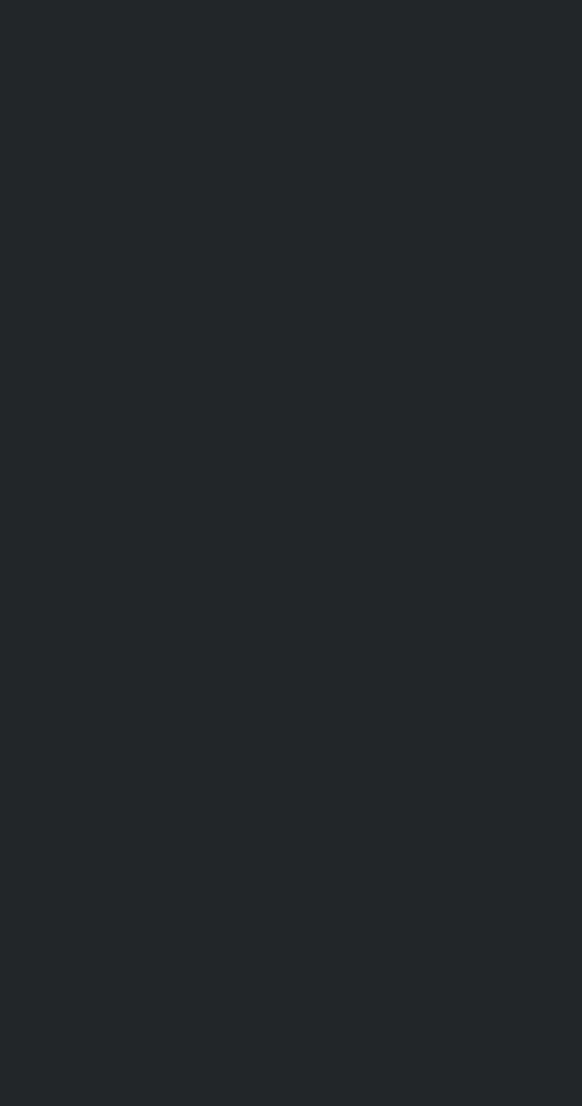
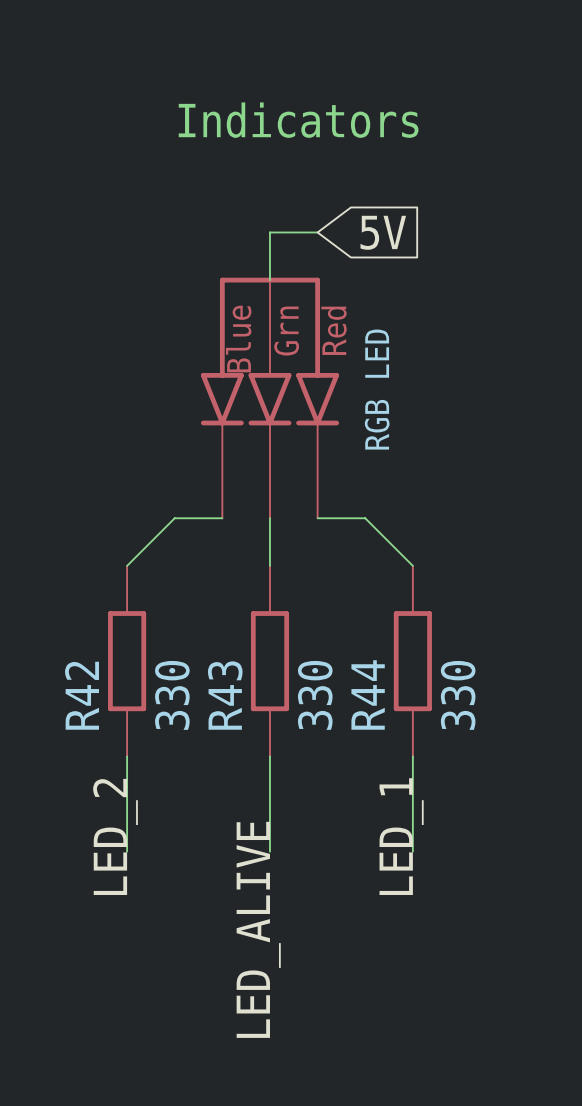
text: none -> Indicators (298, 120)
wire: none -> (317, 232) (269, 232) (269, 280)
global label: none -> 5V (383, 232)
part: none -> (269, 397)
wire: none -> (222, 518) (174, 518) (127, 565)
wire: none -> (269, 518) (269, 565)
wire: none -> (317, 518) (365, 518) (412, 565)
R42: none -> 330 (127, 661)
R43: none -> 330 (269, 661)
R44: none -> 330 (412, 661)
wire: none -> (127, 756) (127, 851)
wire: none -> (269, 756) (269, 851)
wire: none -> (412, 756) (412, 851)
label: none -> LED_2 (115, 836)
label: none -> LED_1 (401, 836)
label: none -> LED_ALIVE (258, 929)

